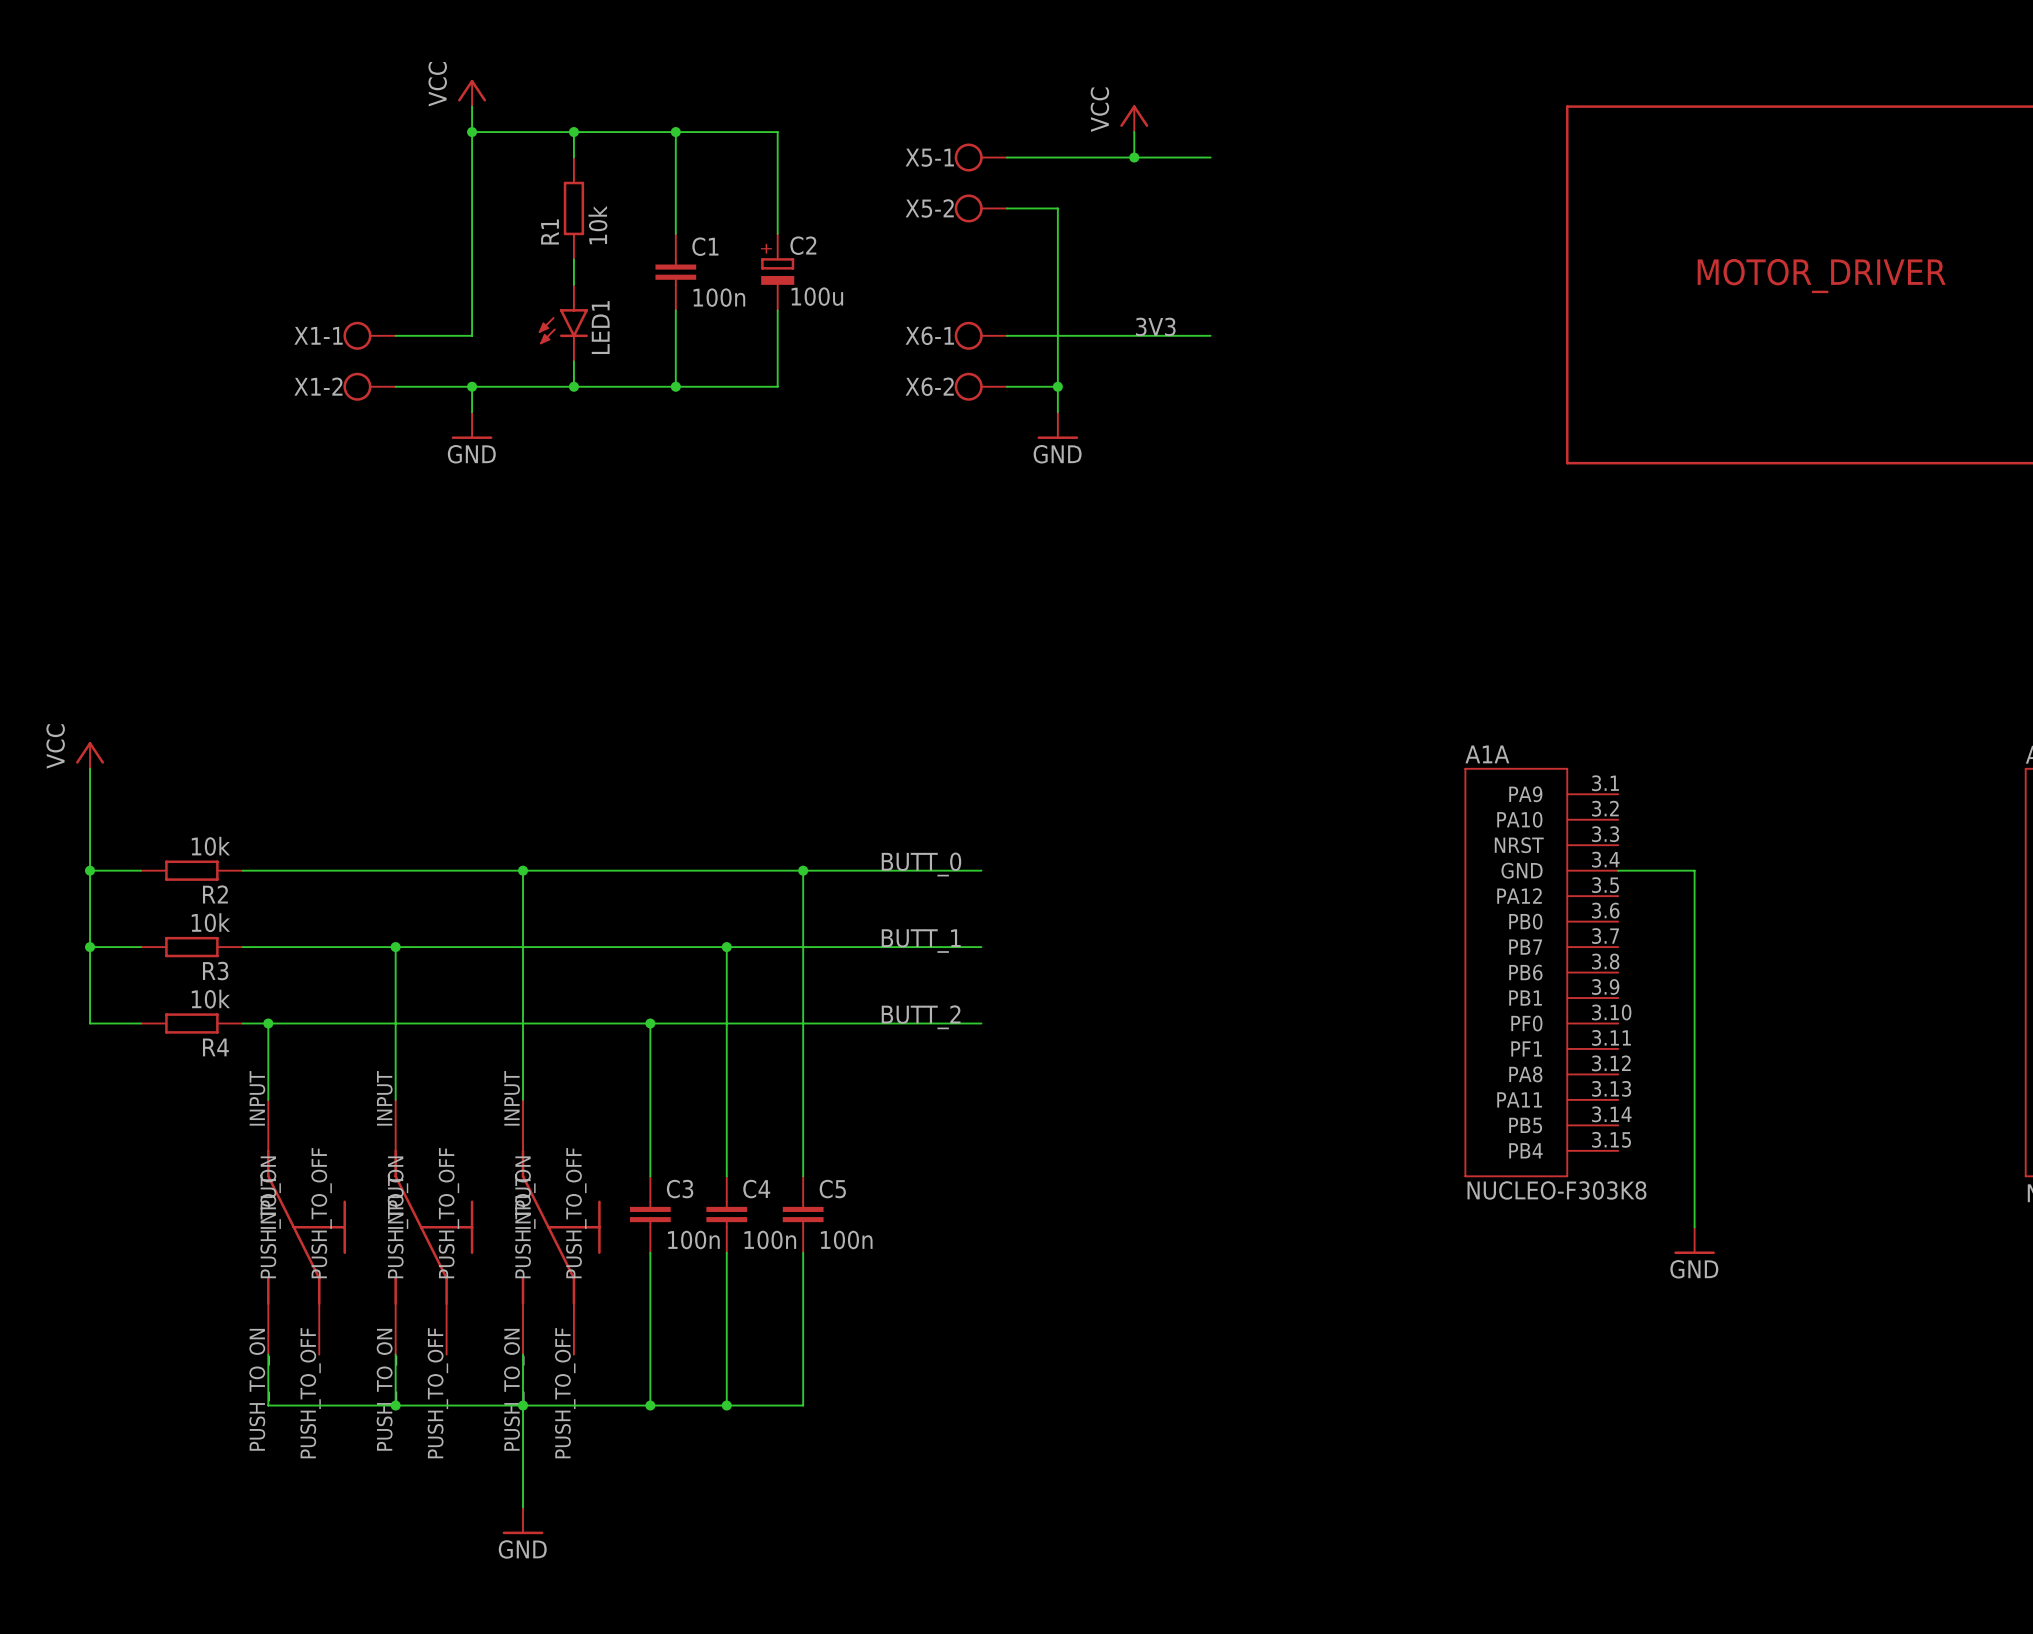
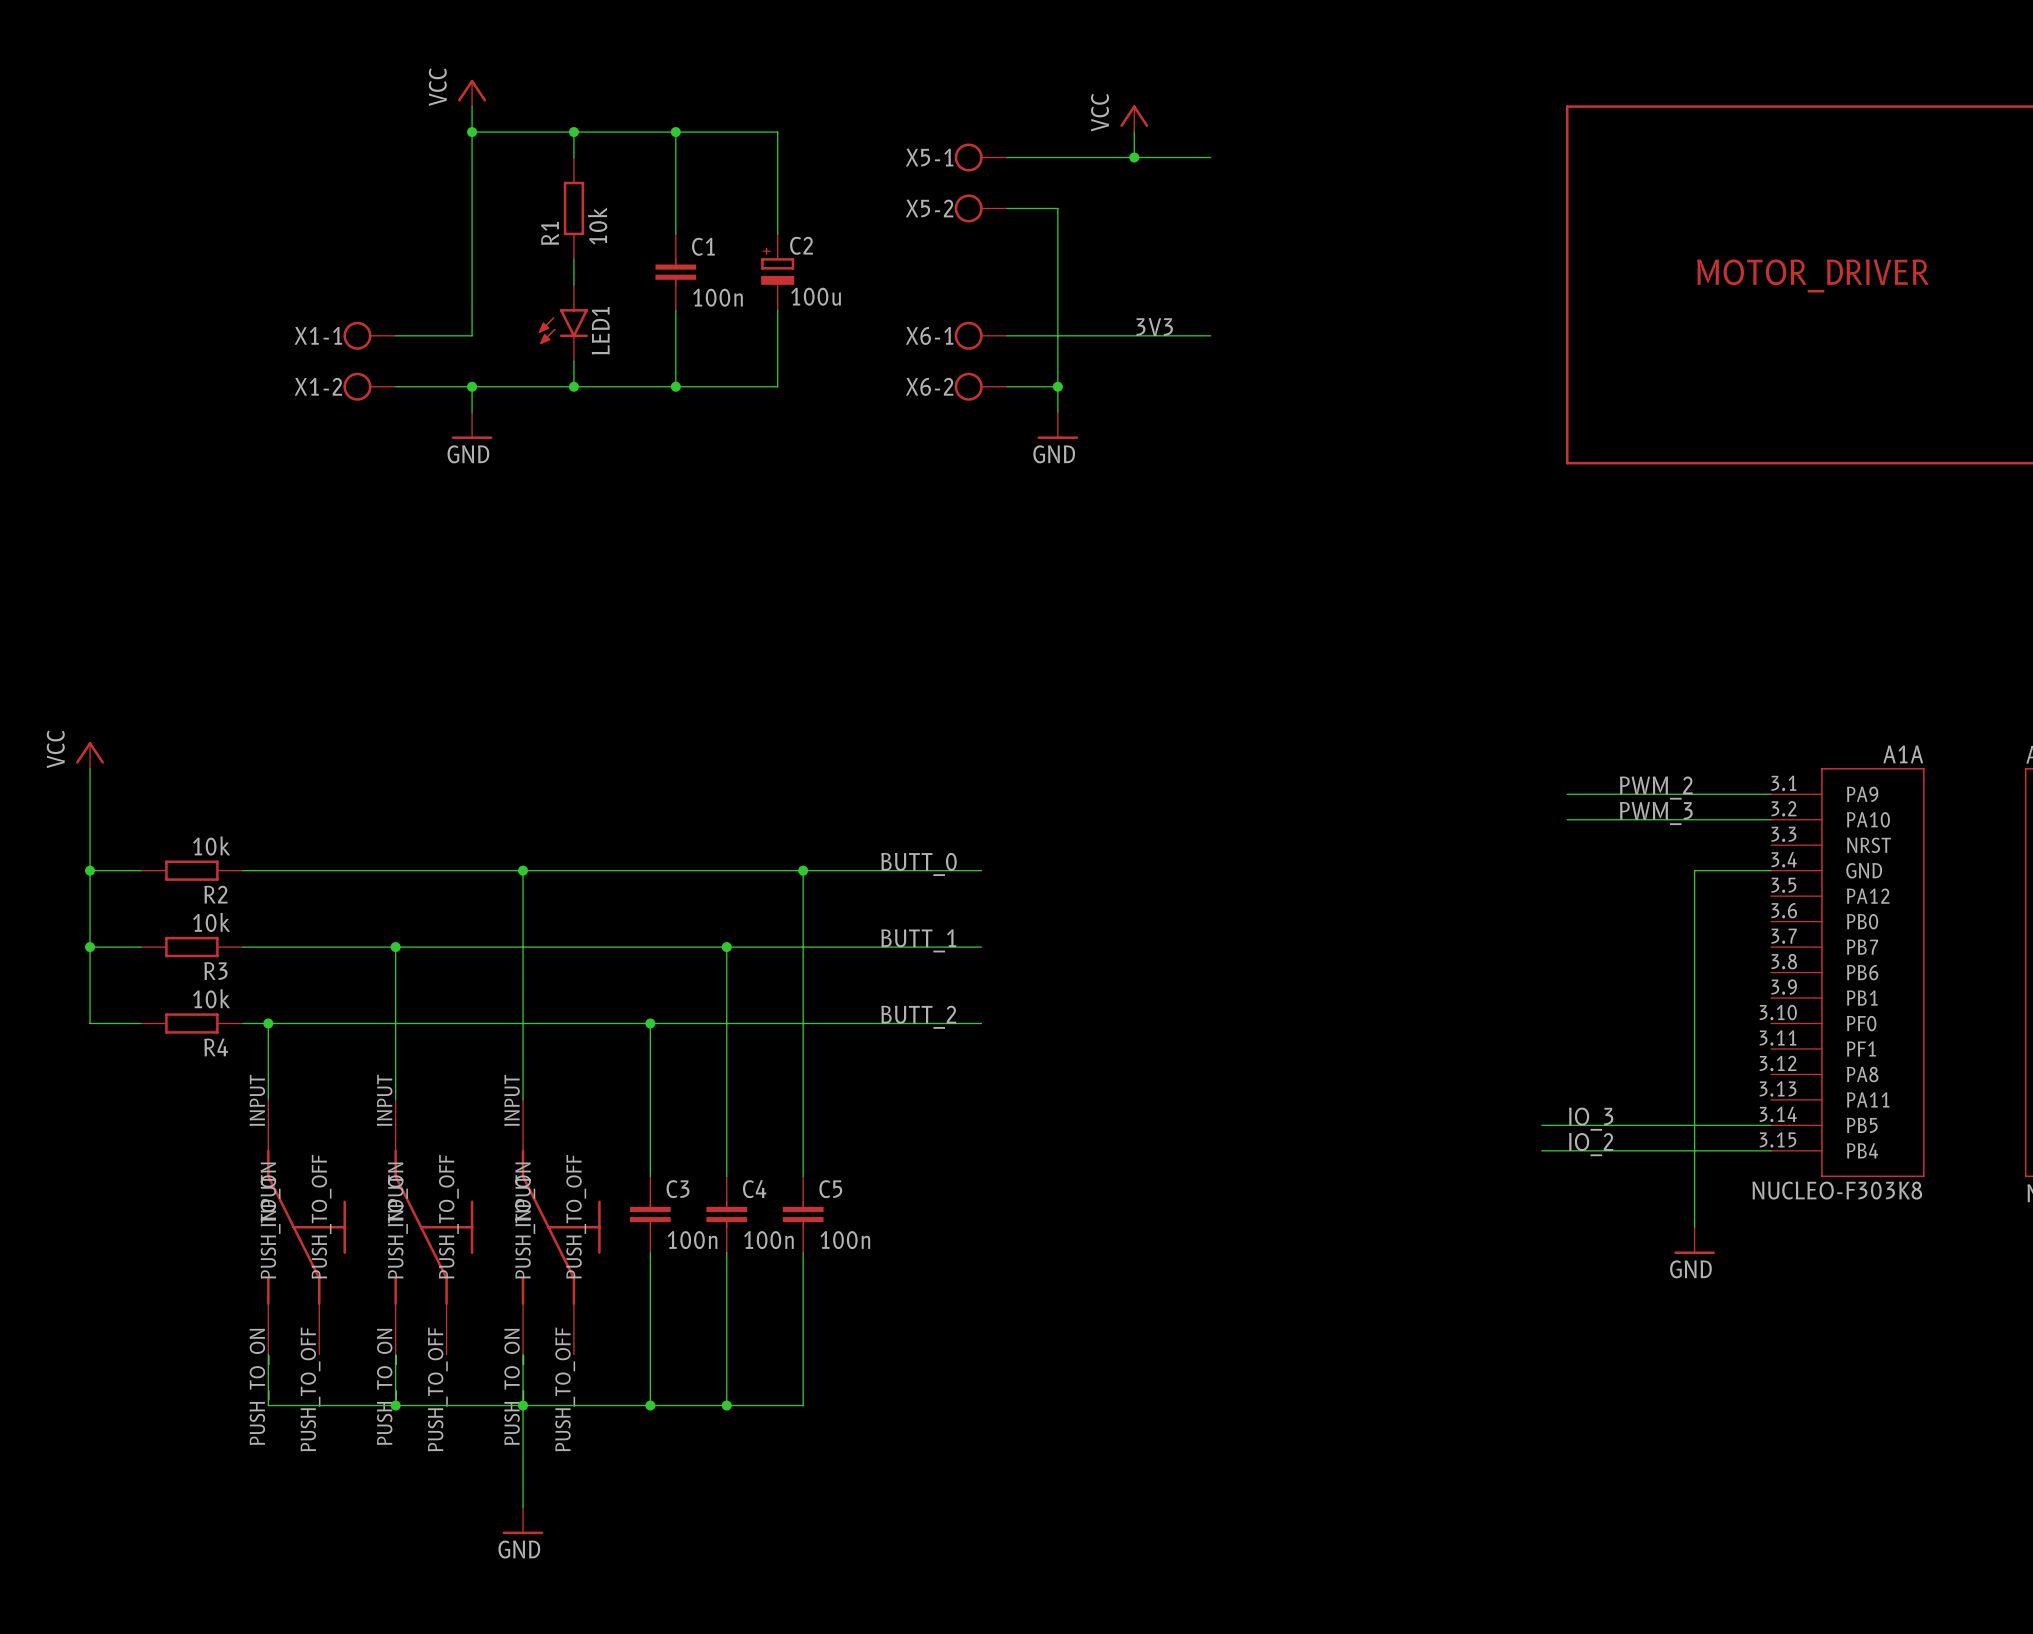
label: none -> PWM_2 (1656, 788)
wire: none -> (1567, 794) (1771, 794)
label: none -> PWM_3 (1656, 813)
wire: none -> (1567, 819) (1771, 819)
wire: (1618, 870) (1694, 870) -> (1771, 870) (1694, 870)
A1A flip: as is (1516, 972) -> left-right (1872, 972)
A1A position: (1541, 972) -> (1847, 972)
label: none -> IO_3 (1591, 1119)
wire: none -> (1541, 1125) (1771, 1125)
label: none -> IO_2 (1591, 1144)
wire: none -> (1541, 1150) (1771, 1150)

